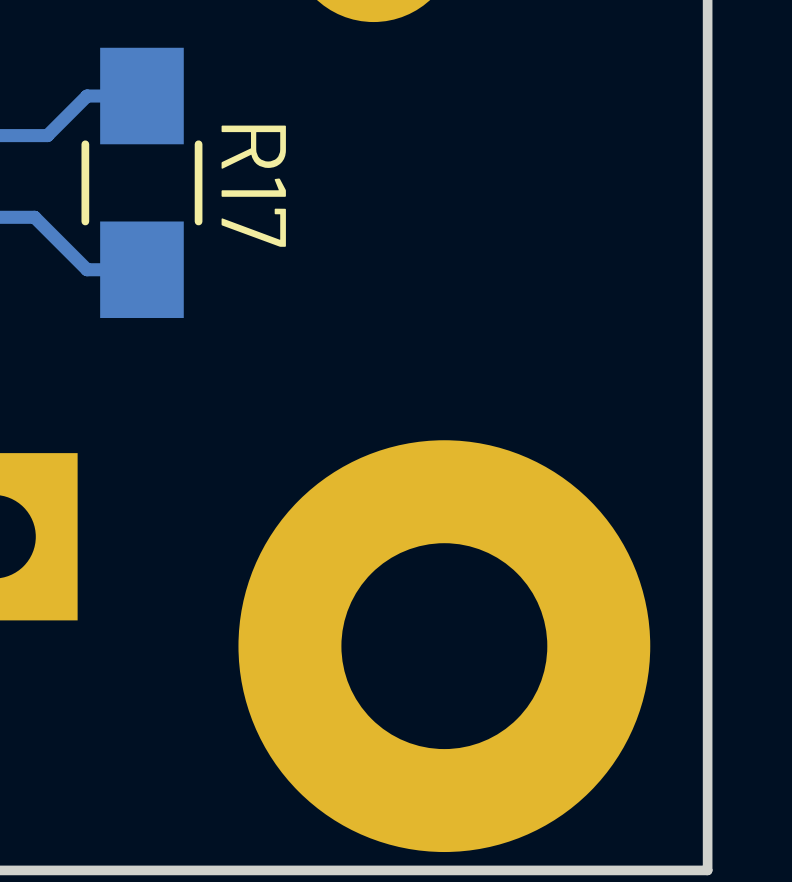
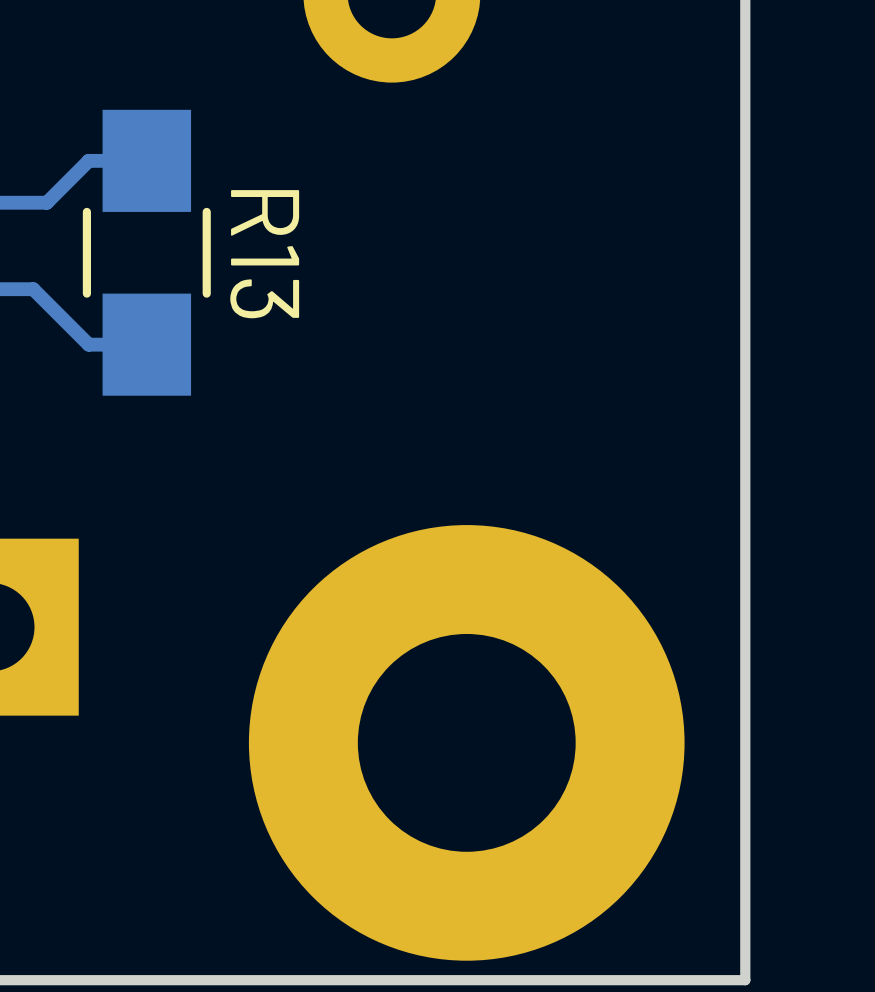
R17 name: R17 (253, 186) -> R13 (264, 254)

